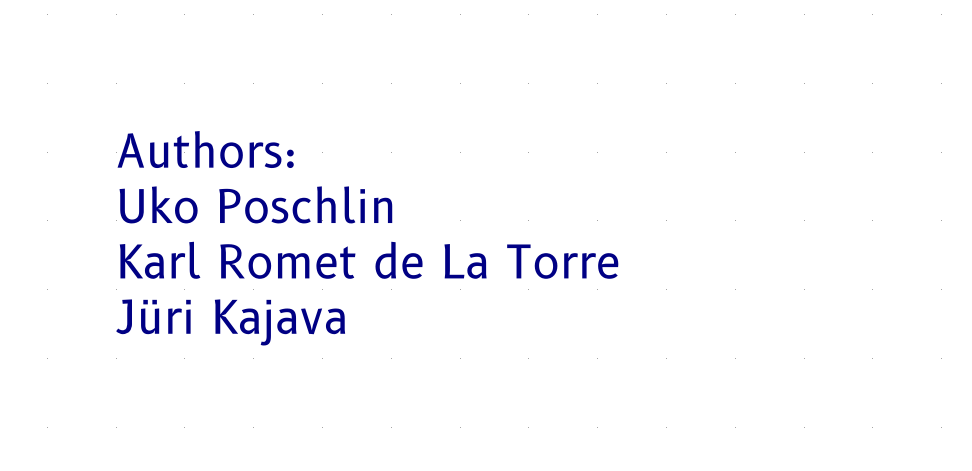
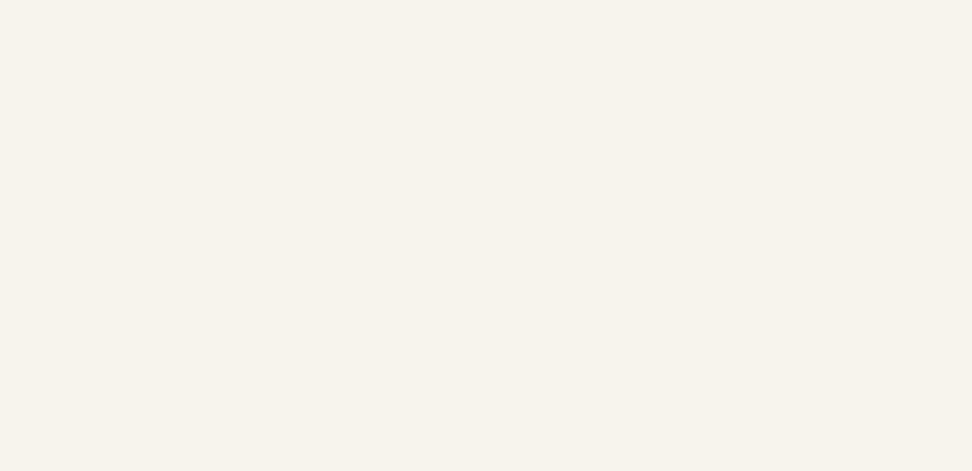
text: Authors: (205, 149) -> none
text: Uko Poschlin (255, 204) -> none
text: Karl Romet de La Torre (369, 260) -> none
text: Jüri Kajava (230, 322) -> none

